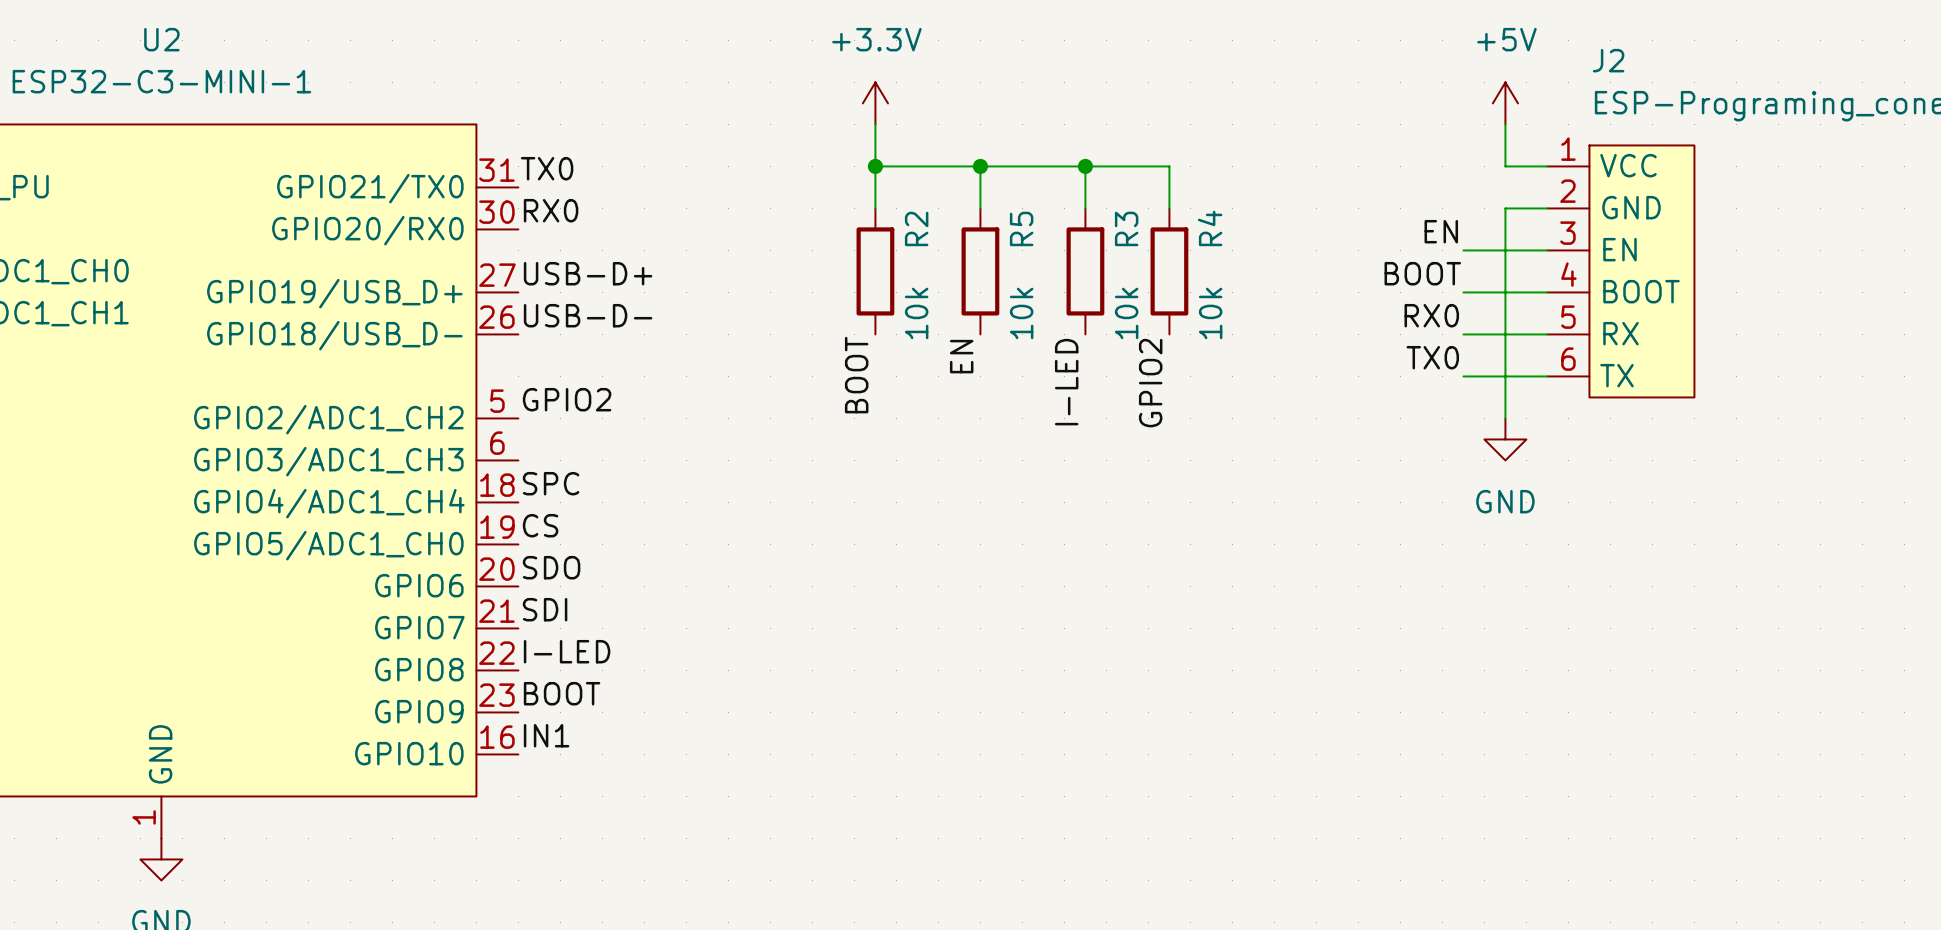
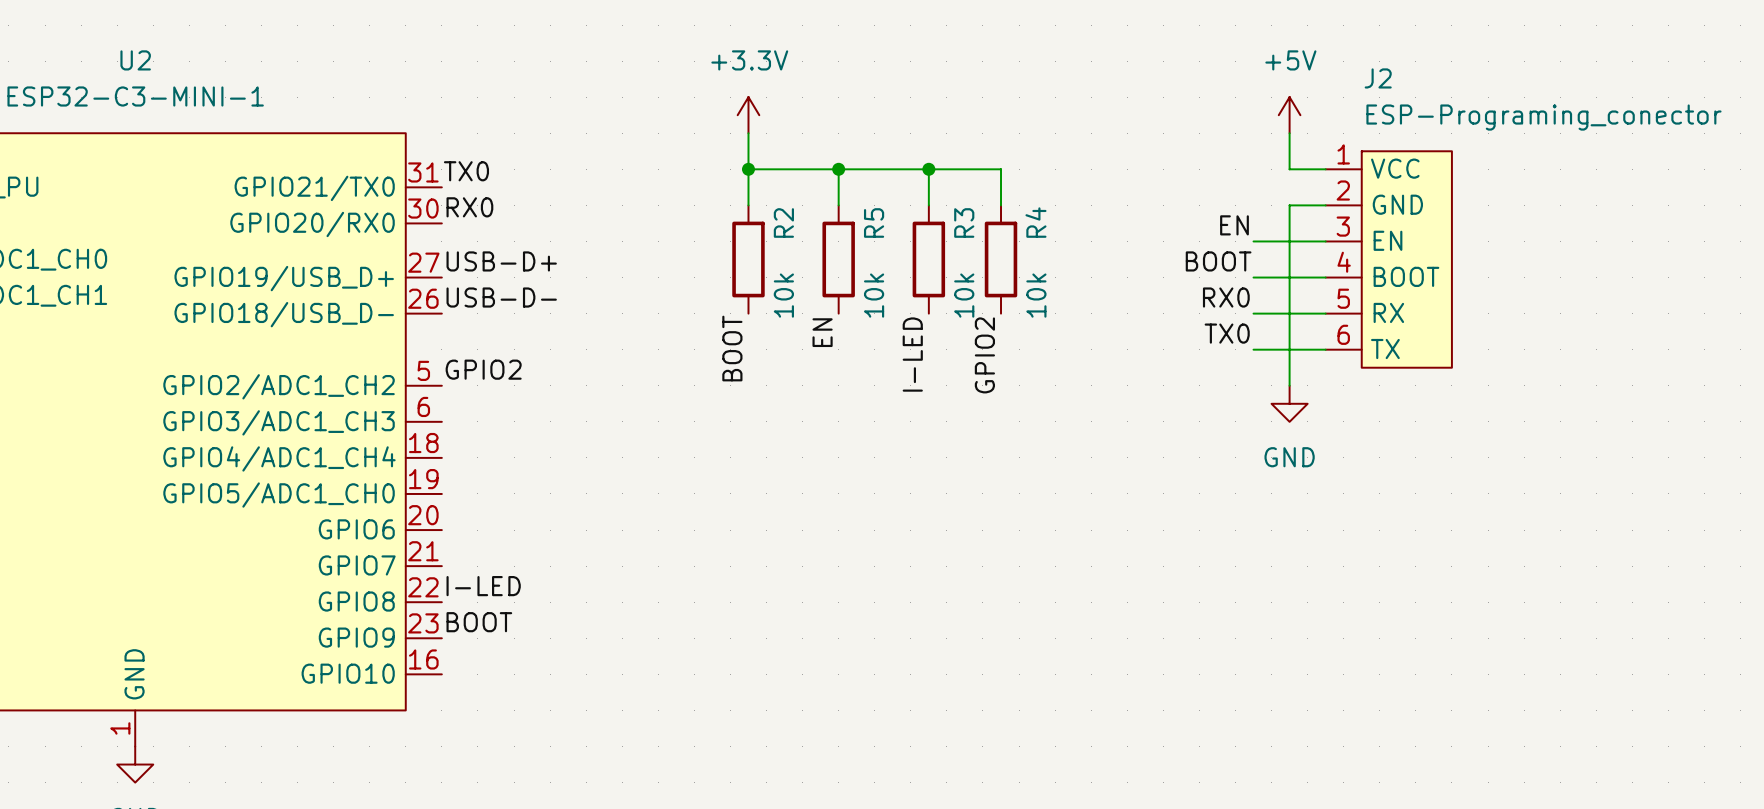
label: SPC (551, 483) -> none
label: CS (540, 525) -> none
label: SDO (551, 567) -> none
label: SDI (545, 609) -> none
label: IN1 (546, 735) -> none

